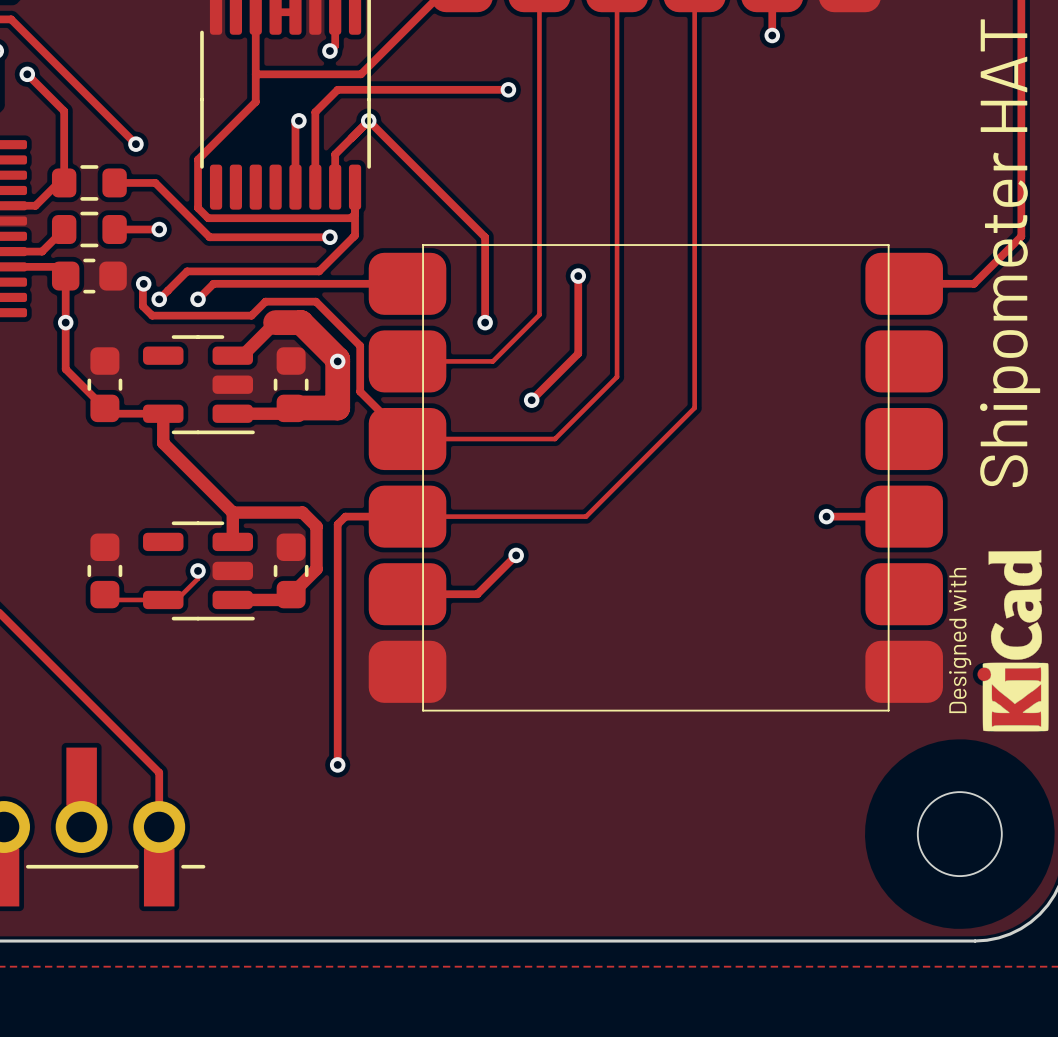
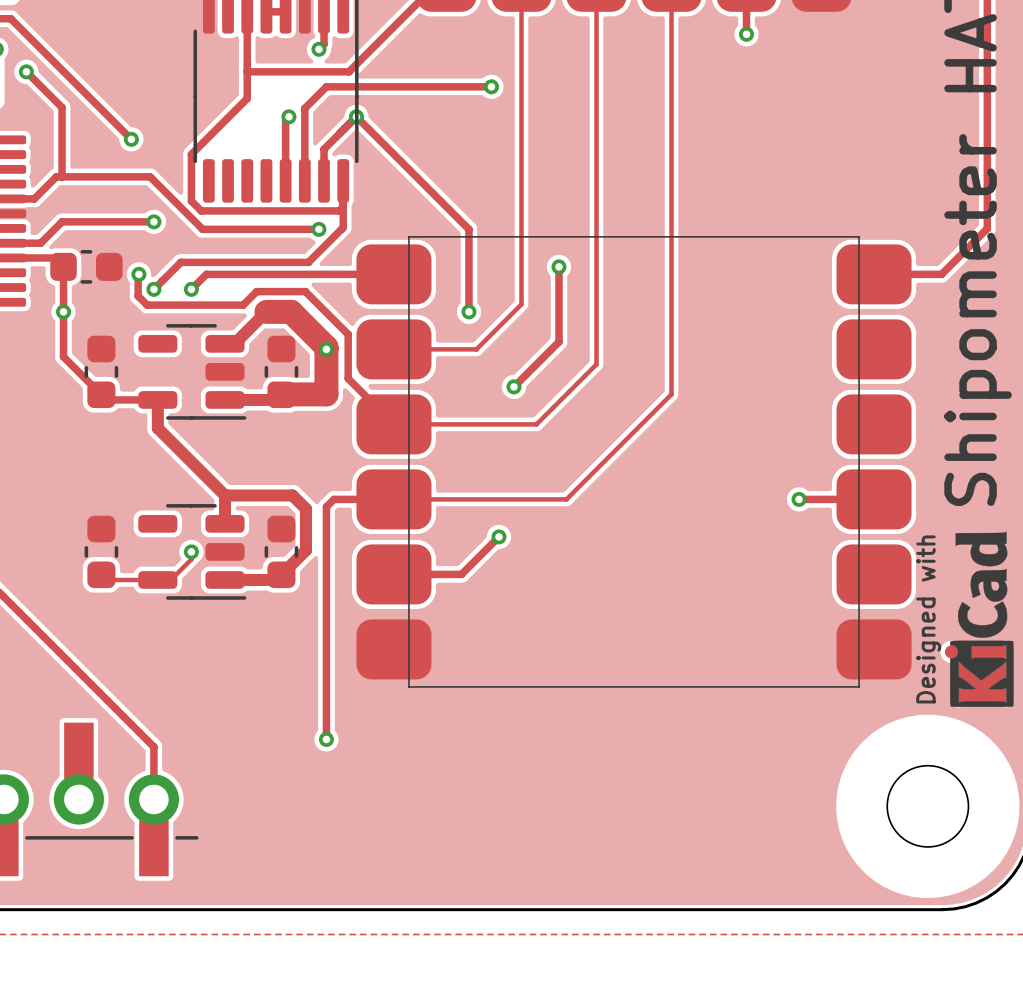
track: none -> (62, 176) (110, 176)
part: (89, 182) -> none
track: none -> (62, 221) (110, 221)
part: (89, 229) -> none

